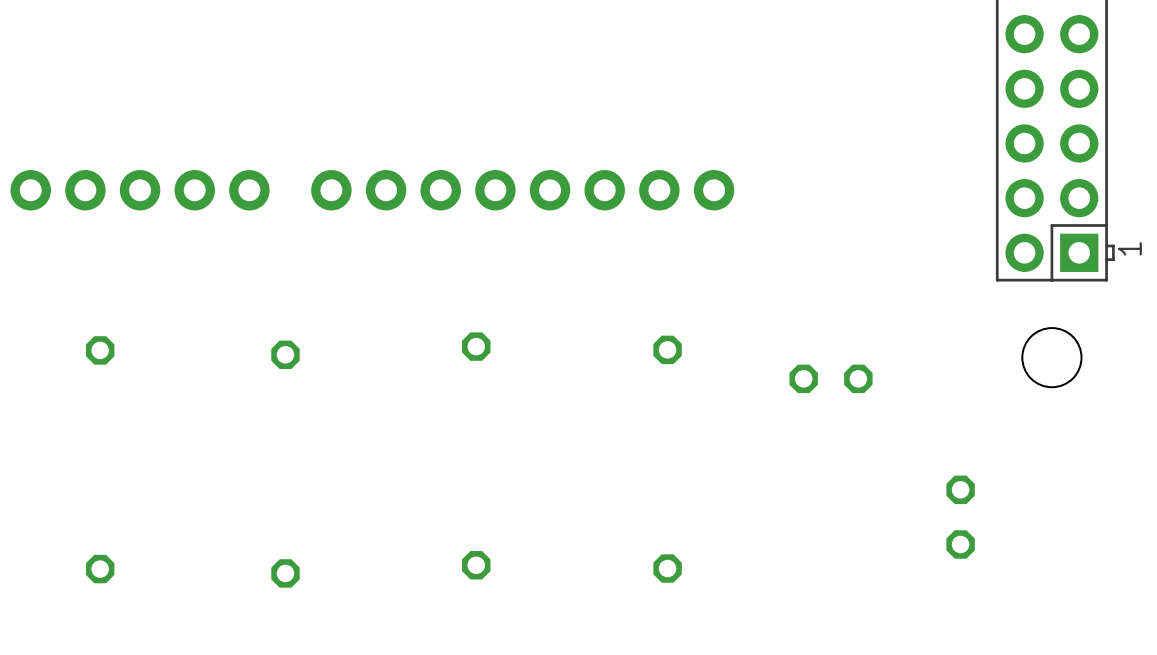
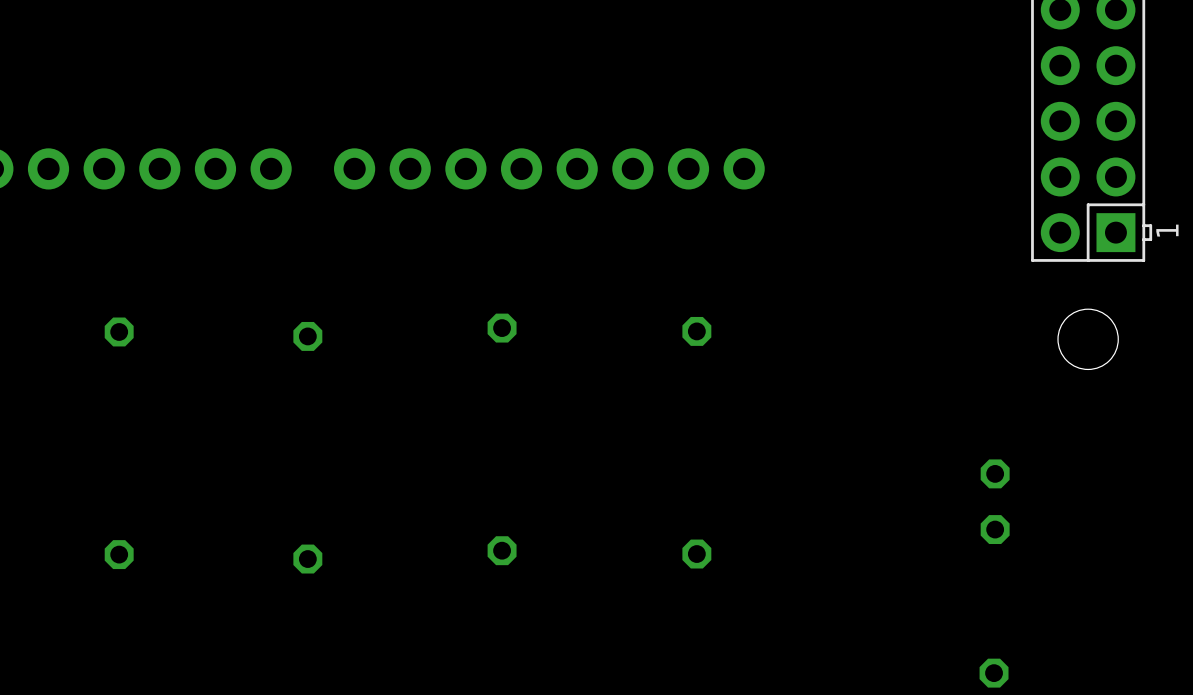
part: (831, 378) -> none

